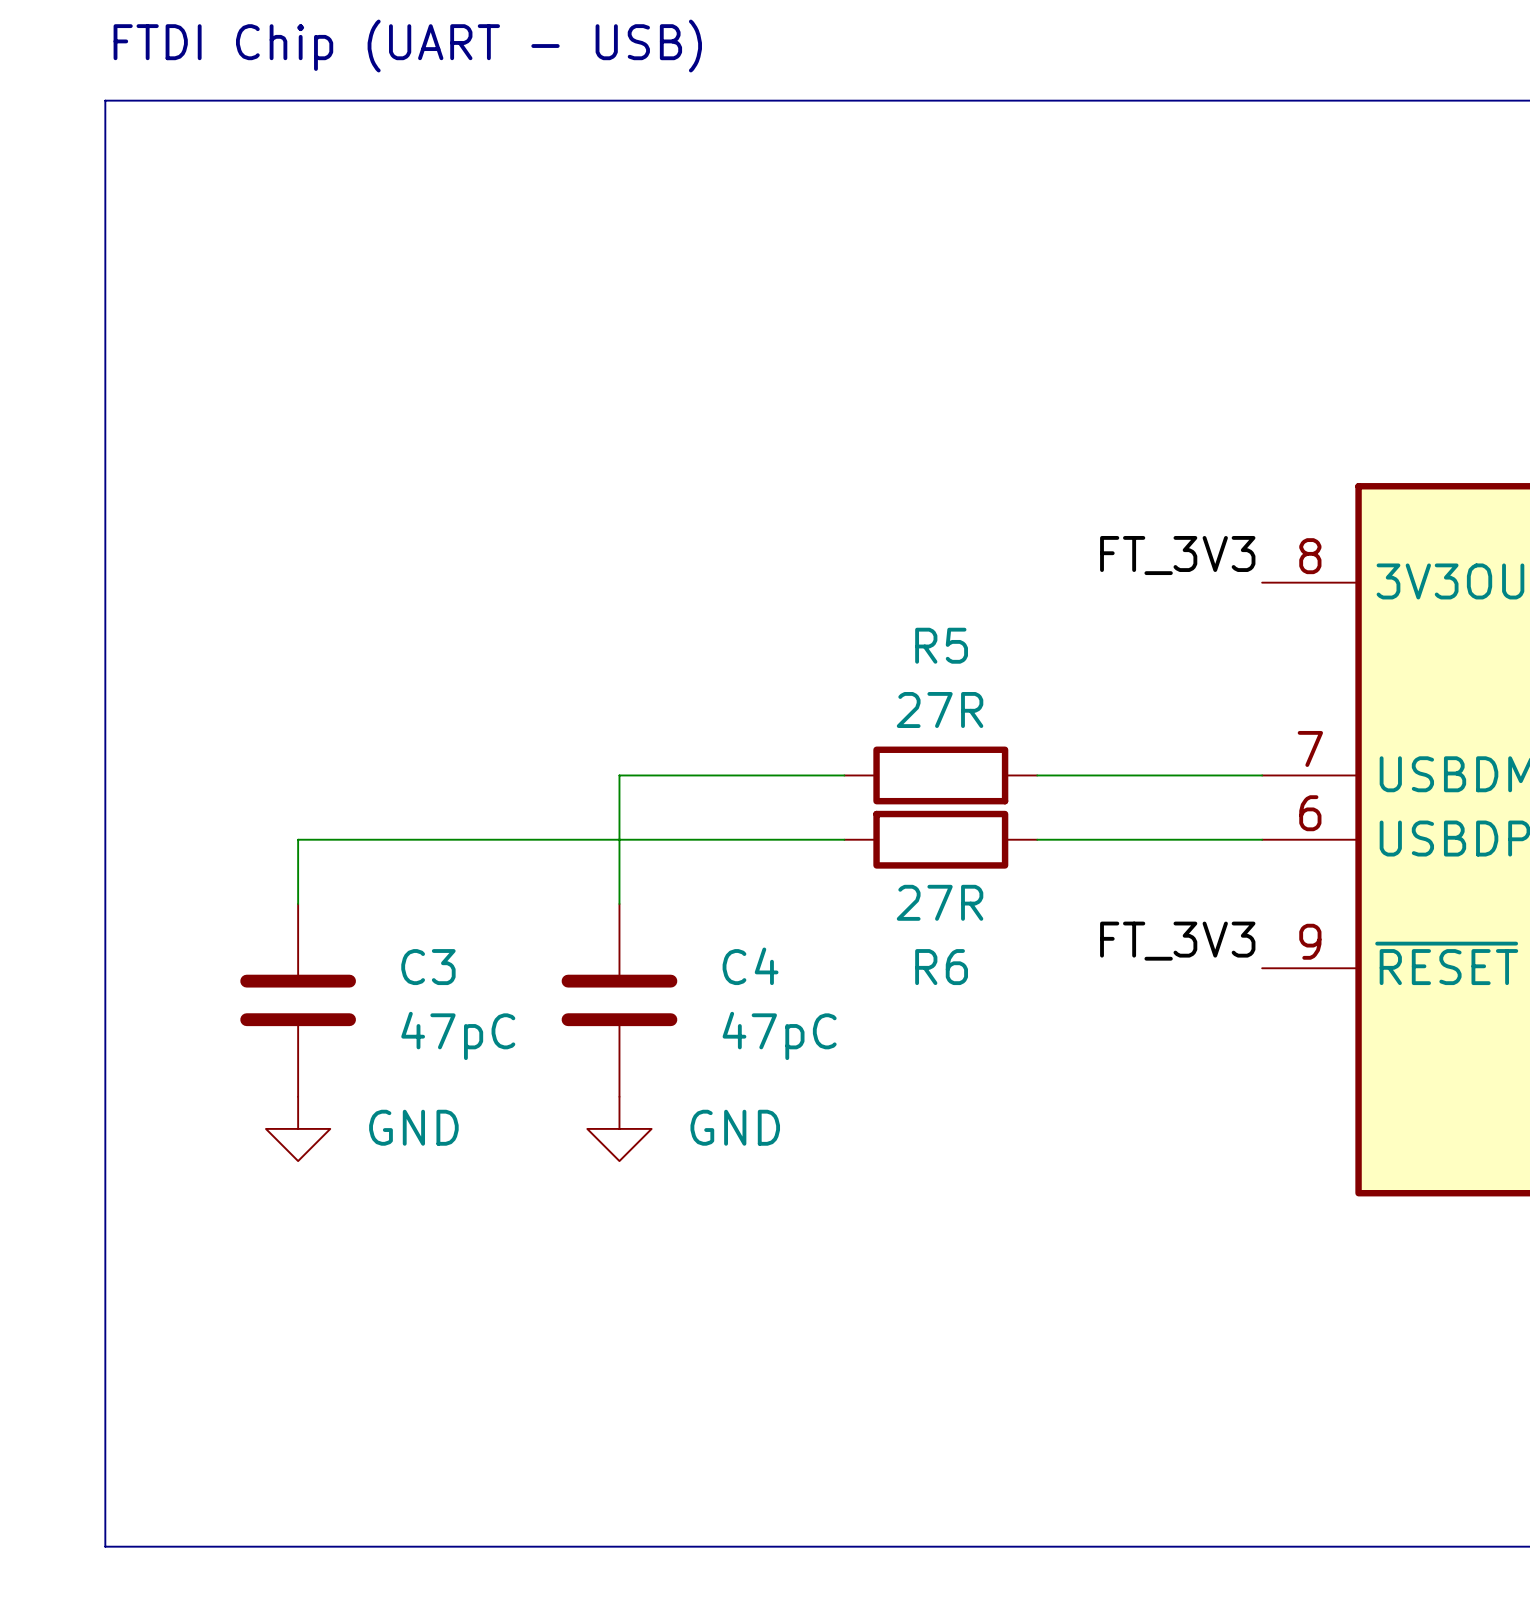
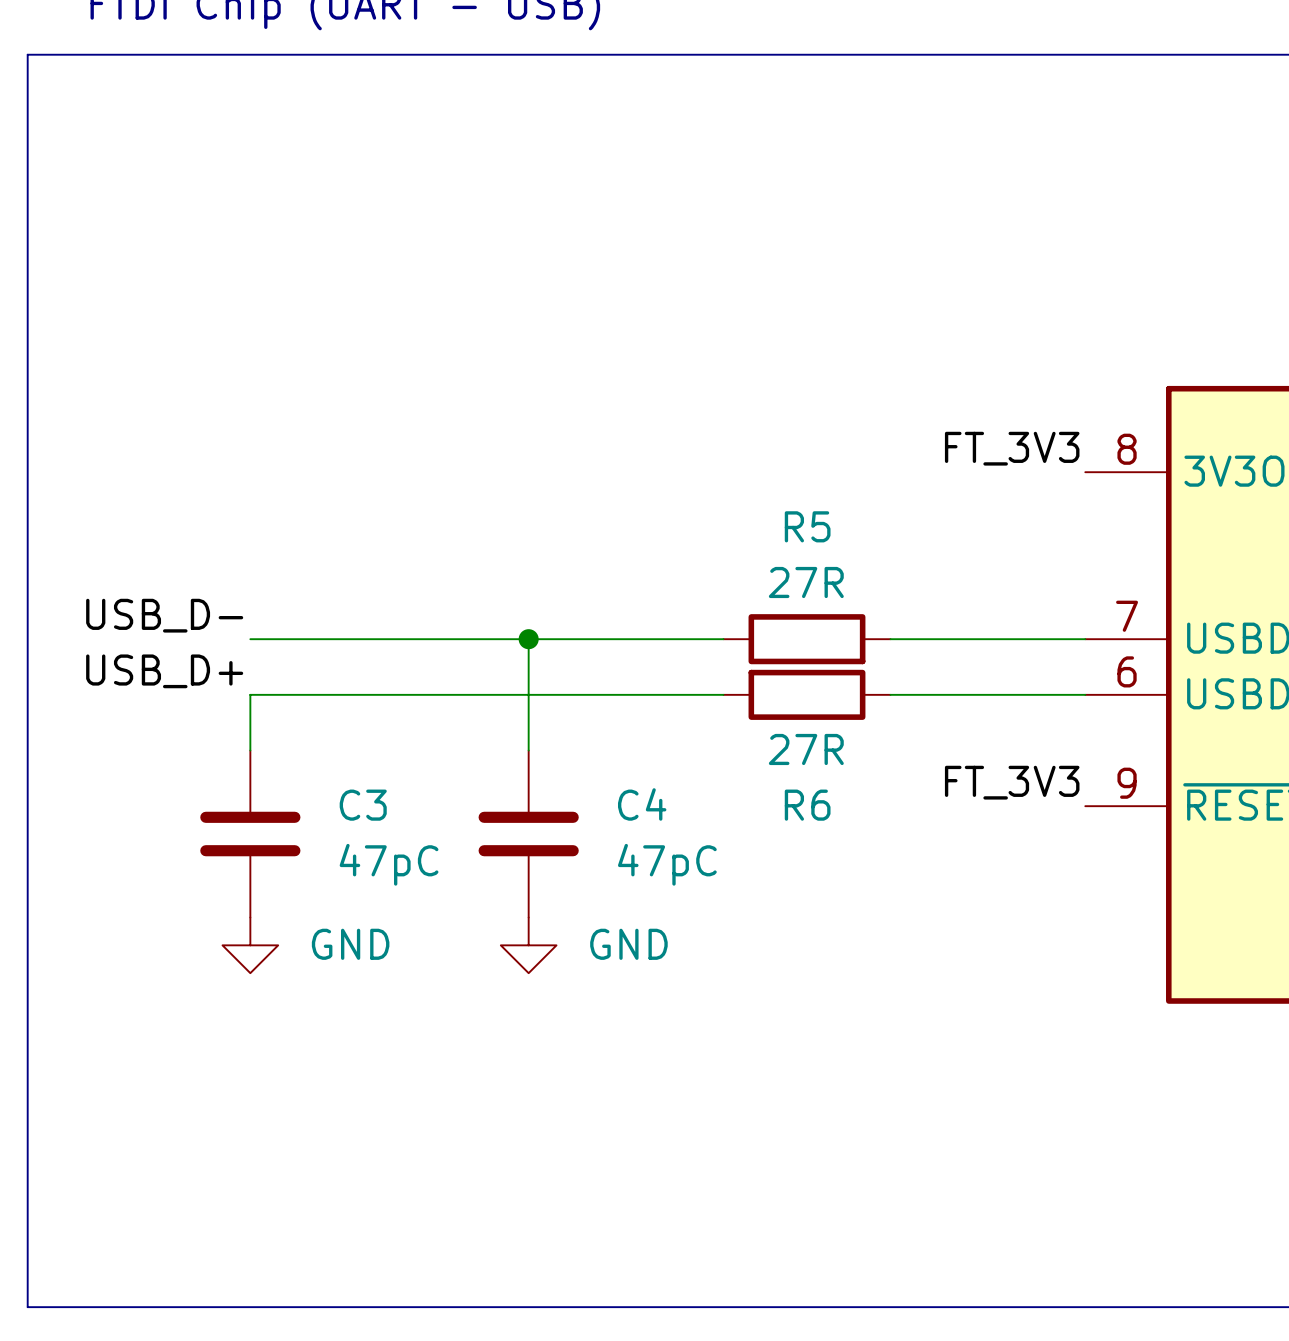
line: (105, 100) (105, 1546) -> (83, 54) (27, 54) (27, 1307) (83, 1307)
label: none -> USB_D- (164, 615)
wire: none -> (250, 639) (528, 639)
junction: none -> (528, 639)
label: none -> USB_D+ (164, 671)

